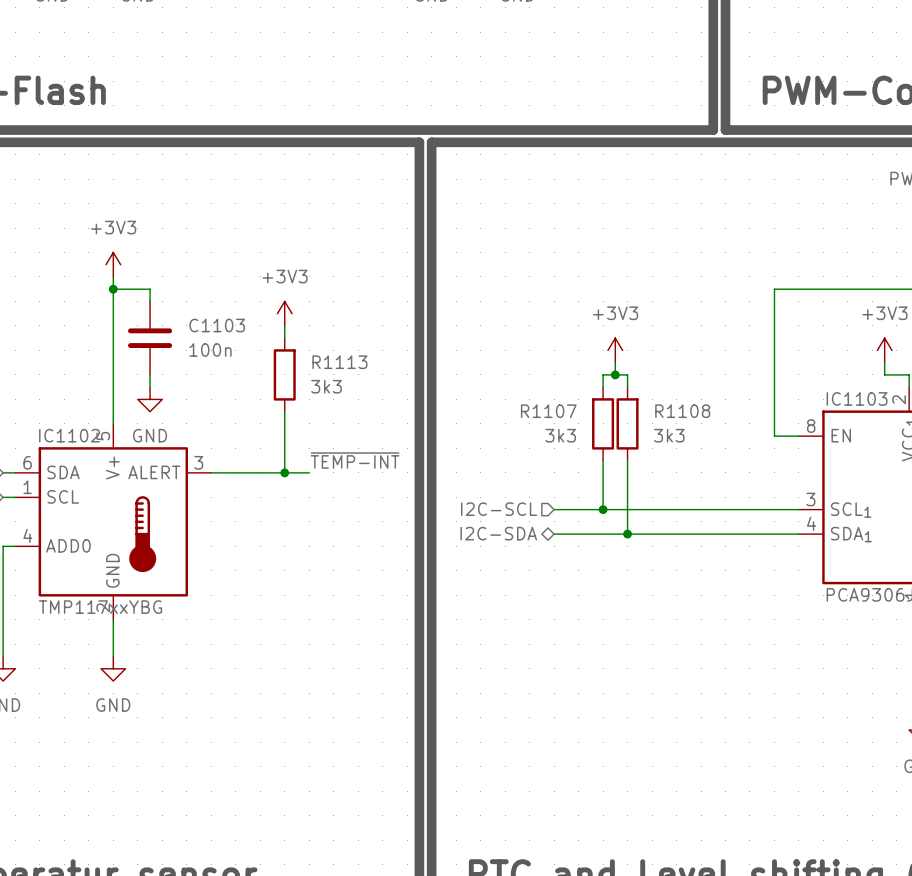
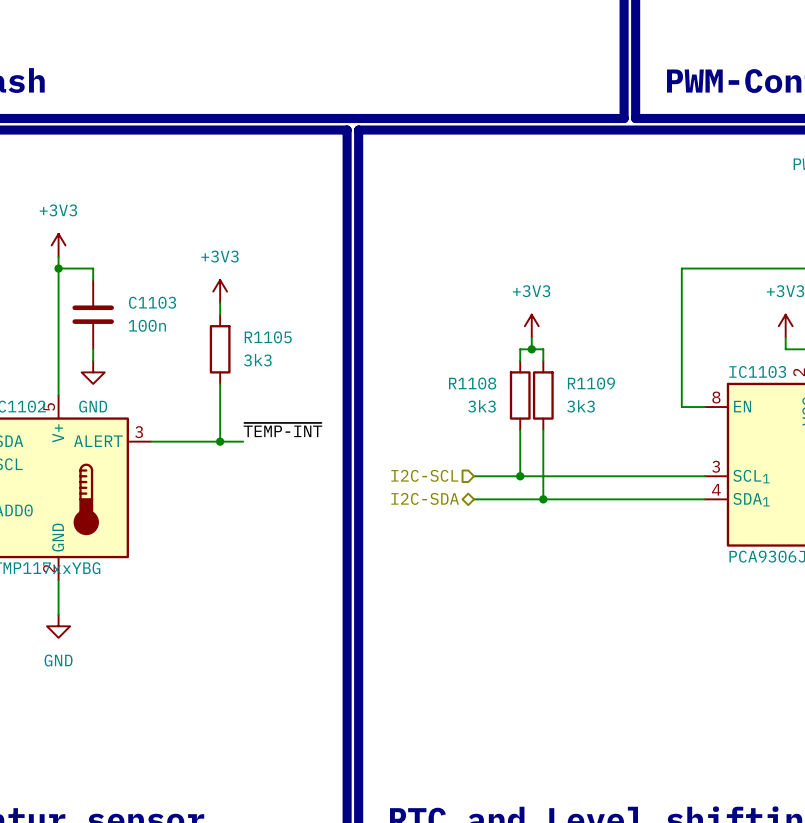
R1113 name: R1113 (339, 362) -> R1105 (268, 337)
R1107 name: R1107 (548, 411) -> R1108 (472, 383)
R1108 name: R1108 (682, 411) -> R1109 (591, 383)

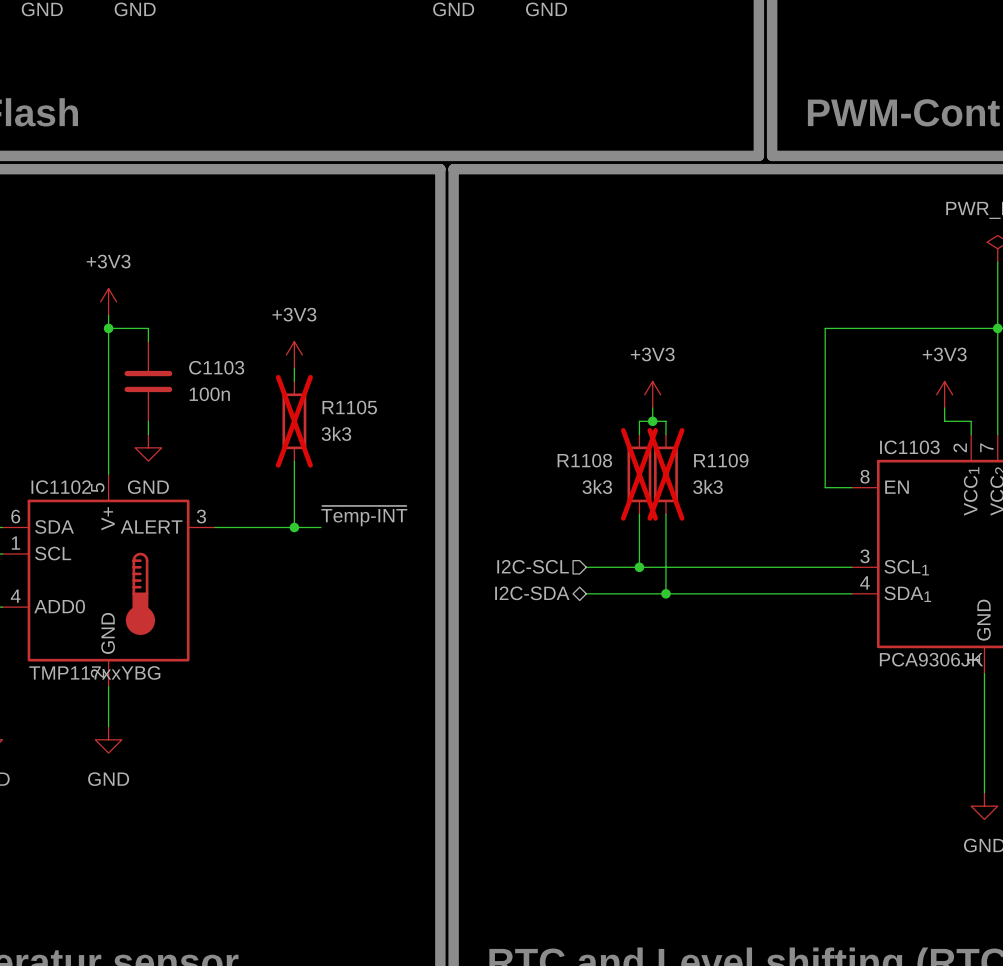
R1105 do-not-place cross: none -> (294, 421)
R1108 do-not-place cross: none -> (639, 474)
R1109 do-not-place cross: none -> (665, 474)
label: ~{TEMP-INT} (282, 430) -> ~{Temp-INT} (364, 516)

